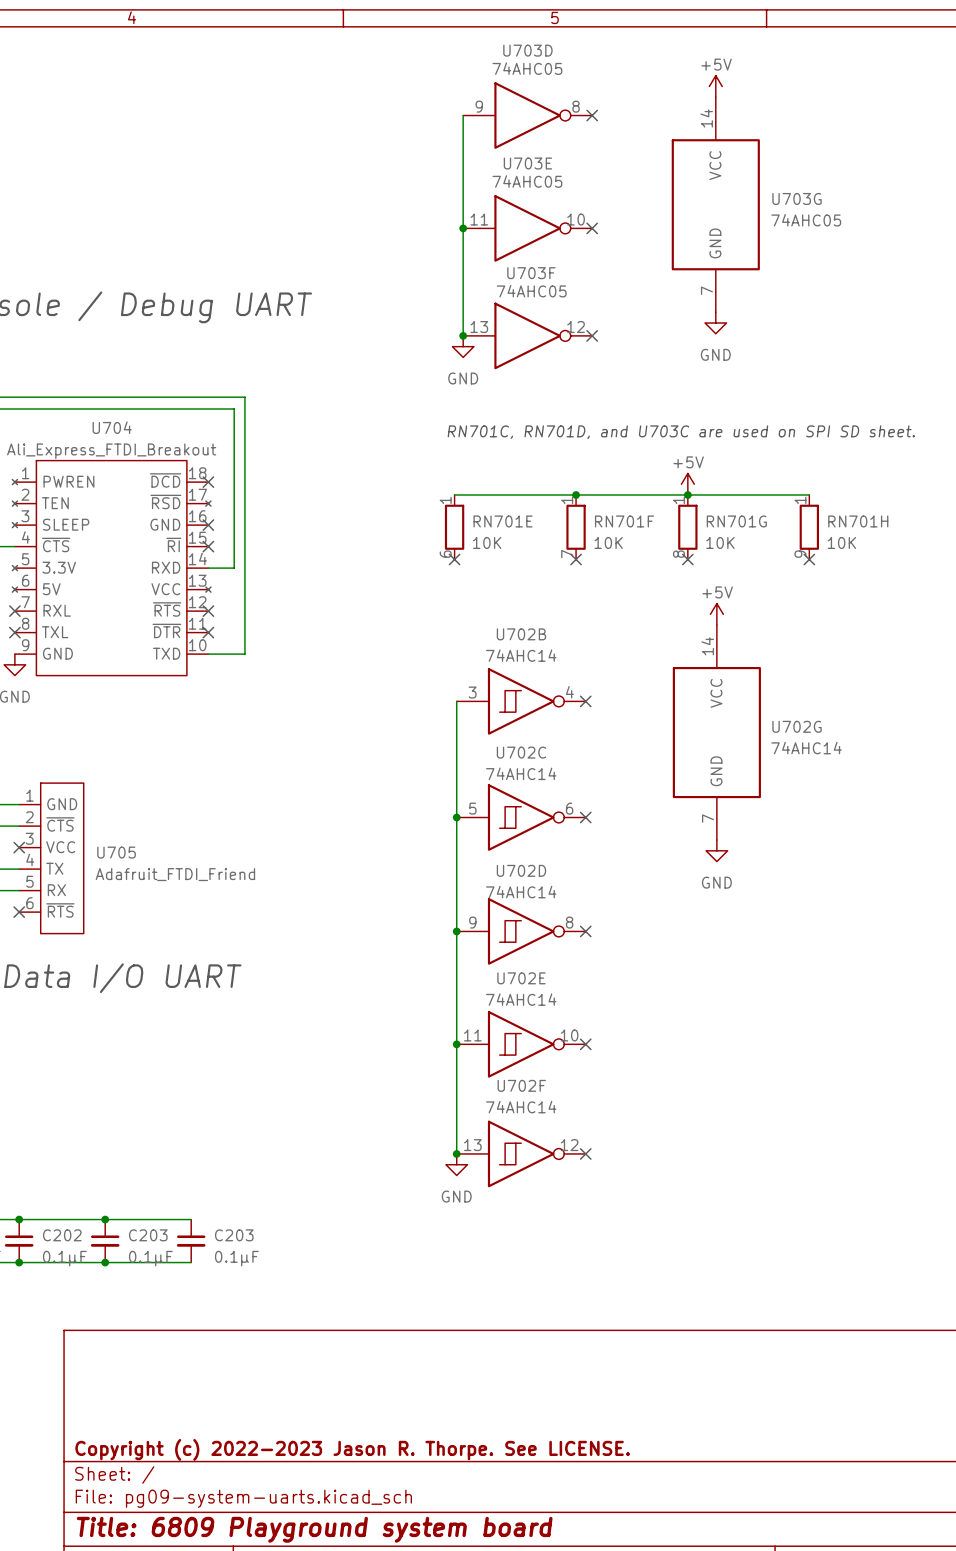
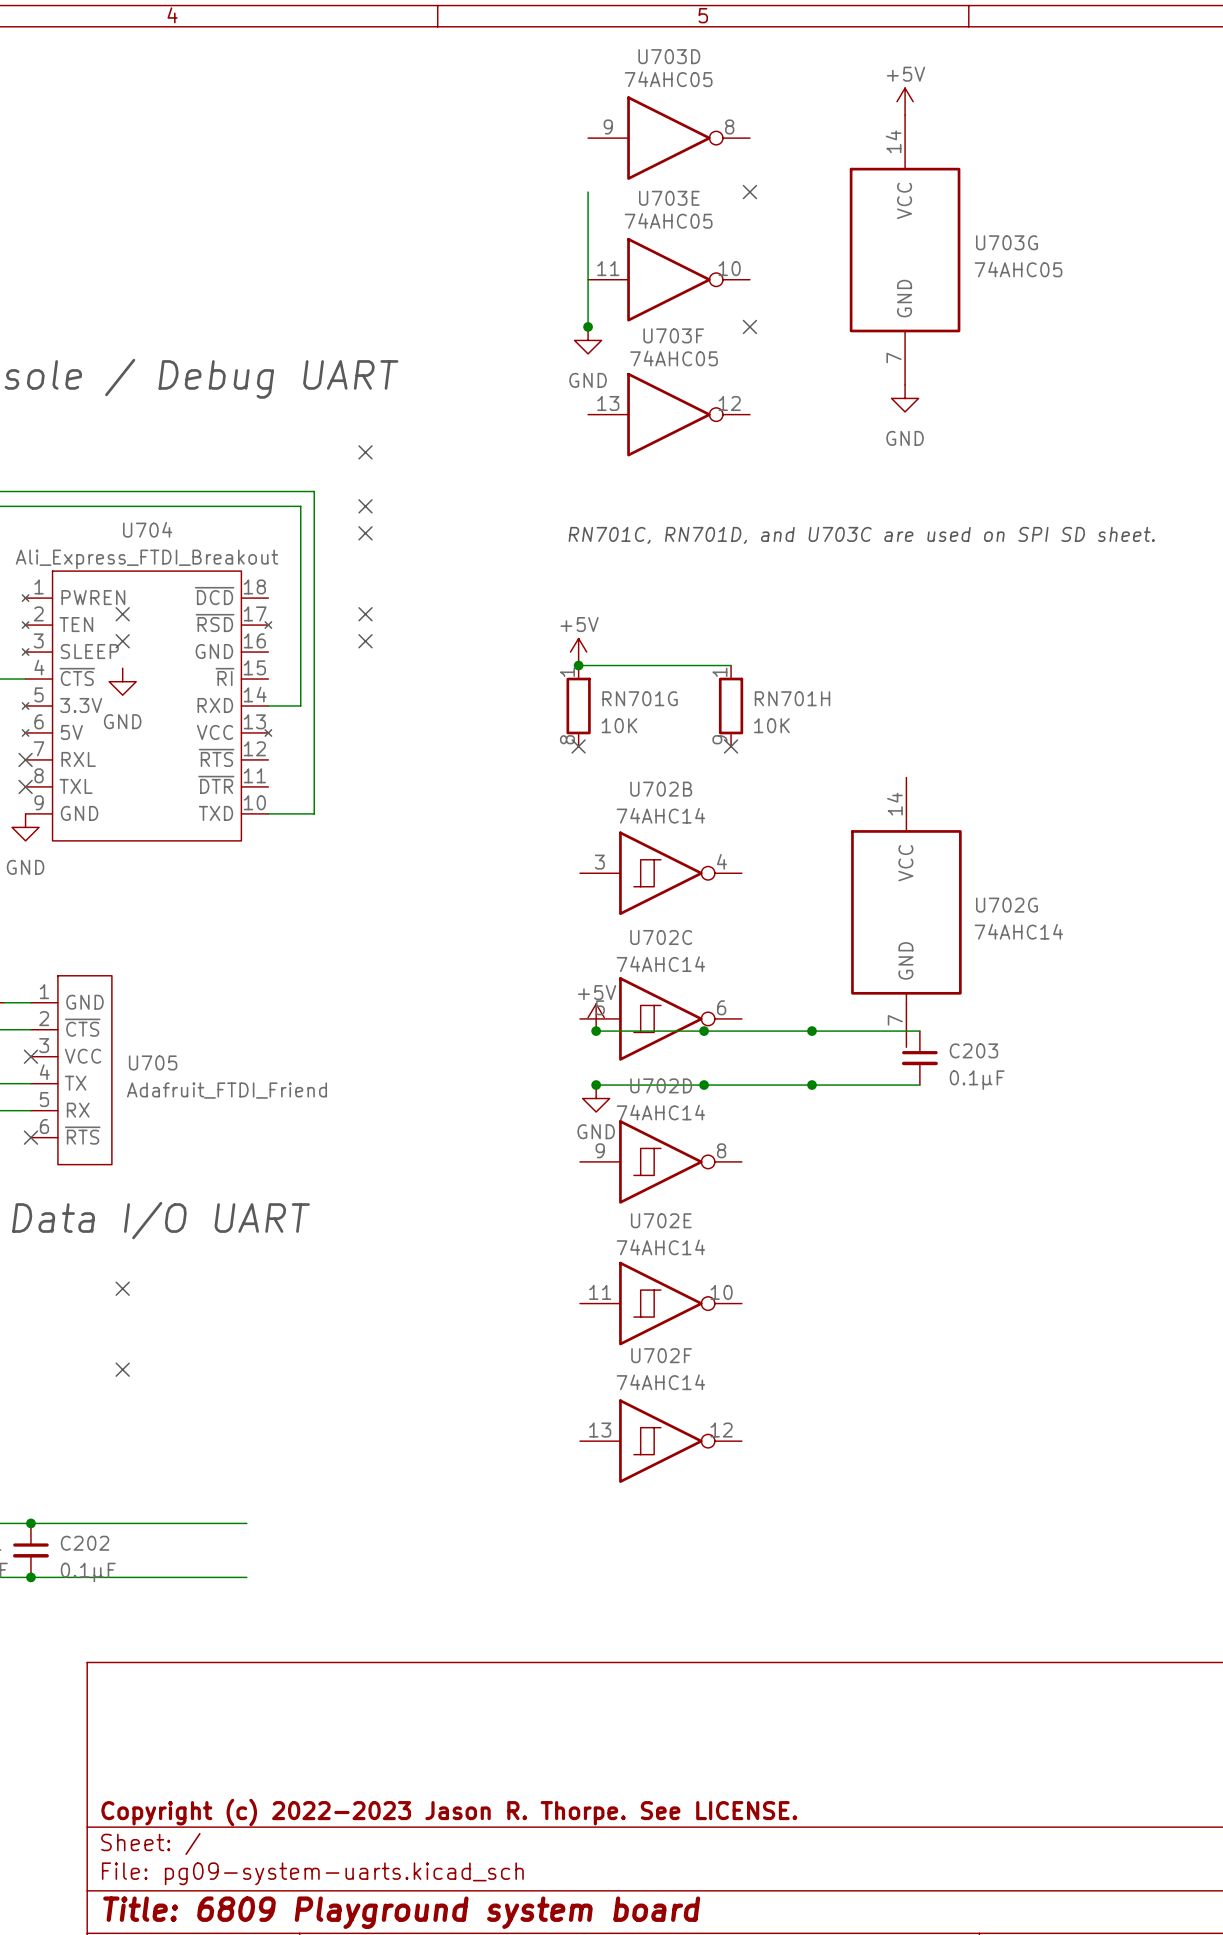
wire: (463, 115) (463, 158) -> none
no-connect mark: (592, 115) -> none
no-connect mark: none -> (749, 192)
junction: (463, 228) -> none
no-connect mark: (592, 228) -> none
wire: (463, 266) (463, 335) -> none
junction: none -> (588, 326)
no-connect mark: none -> (749, 326)
junction: (463, 335) -> none
no-connect mark: (592, 335) -> none
power symbol position: GND (463, 346) -> GND (588, 340)
no-connect mark: none -> (365, 452)
no-connect mark: none -> (365, 506)
no-connect mark: none -> (365, 533)
no-connect mark: (208, 482) -> none
power symbol: +5V (687, 484) -> none
no-connect mark: none -> (122, 614)
no-connect mark: none -> (365, 614)
wire: (454, 495) (809, 495) -> none
junction: (576, 495) -> none
junction: (687, 495) -> none
no-connect mark: none -> (122, 641)
no-connect mark: none -> (365, 641)
no-connect mark: (208, 525) -> none
power symbol: none -> +5V (578, 652)
RN701E: 10K (454, 527) -> none
RN701F: 10K (576, 527) -> none
RN701G position: (687, 527) -> (578, 705)
RN701H position: (809, 527) -> (731, 705)
wire: none -> (578, 665) (731, 665)
junction: none -> (578, 665)
no-connect mark: (208, 546) -> none
power symbol: none -> GND (122, 681)
no-connect mark position: (454, 559) -> (578, 746)
no-connect mark position: (576, 559) -> (731, 746)
no-connect mark: (687, 559) -> none
no-connect mark: (809, 559) -> none
no-connect mark: (208, 611) -> none
power symbol: +5V (716, 614) -> none
no-connect mark: (208, 632) -> none
wire: (456, 701) (456, 1153) -> none
no-connect mark: (585, 701) -> none
power symbol: none -> +5V (596, 1017)
junction position: (456, 817) -> (596, 1031)
no-connect mark: (585, 817) -> none
wire: none -> (596, 1031) (919, 1031)
junction: none -> (704, 1031)
junction: none -> (811, 1031)
C203: none -> 0.1µF (919, 1058)
power symbol: GND (716, 850) -> none
wire: none -> (596, 1085) (919, 1085)
junction: none -> (596, 1085)
junction: none -> (704, 1085)
junction: none -> (811, 1085)
power symbol: none -> GND (596, 1098)
junction: (456, 931) -> none
no-connect mark: (585, 931) -> none
no-connect mark: none -> (122, 1288)
junction: (456, 1044) -> none
no-connect mark: (585, 1044) -> none
no-connect mark: none -> (122, 1369)
junction: (456, 1153) -> none
no-connect mark: (585, 1153) -> none
power symbol: GND (456, 1164) -> none
junction: (105, 1219) -> none
C203: 0.1µF (105, 1241) -> none
C203: 0.1µF (191, 1241) -> none
junction: (105, 1262) -> none

